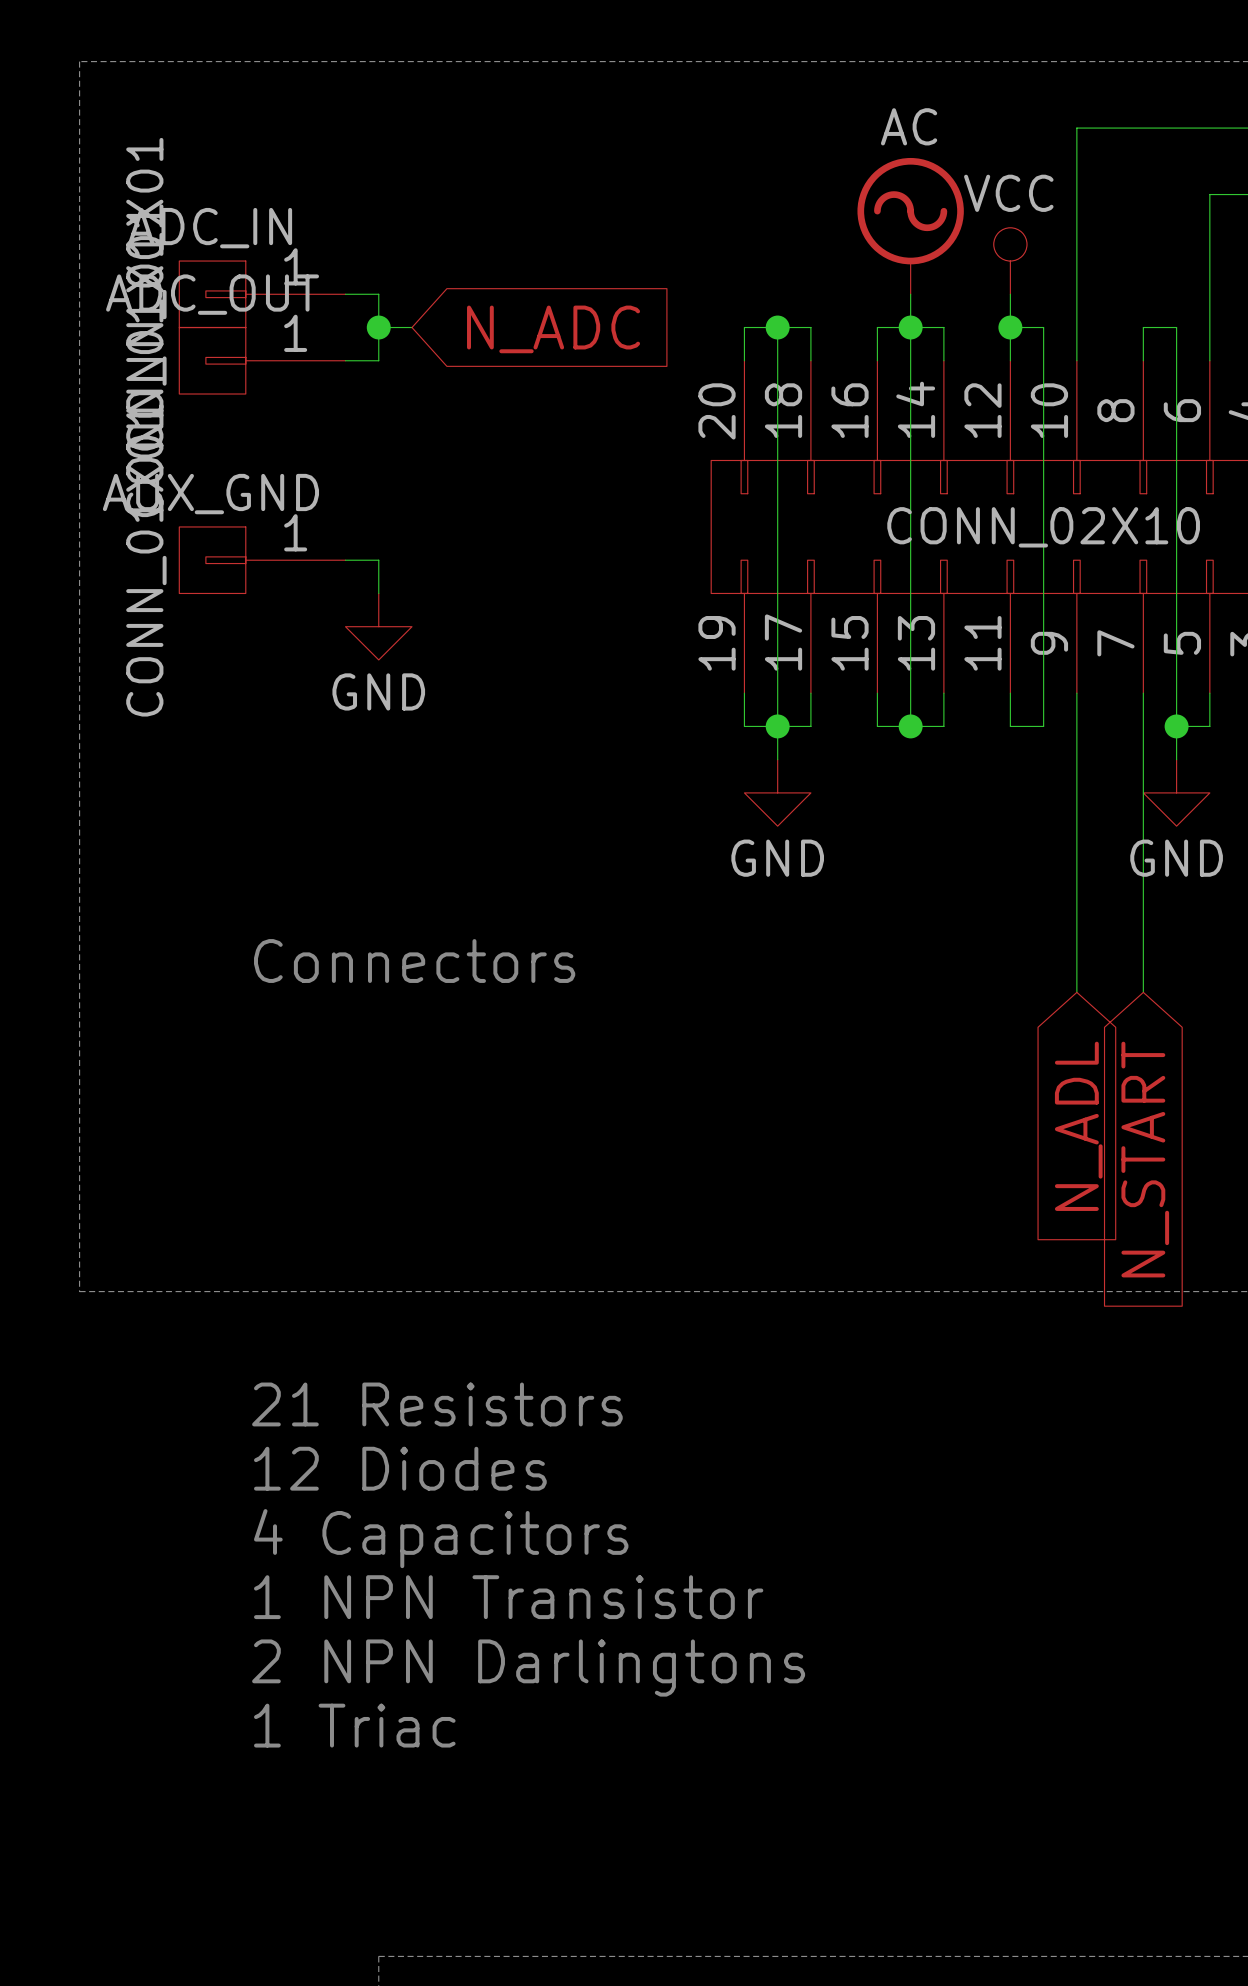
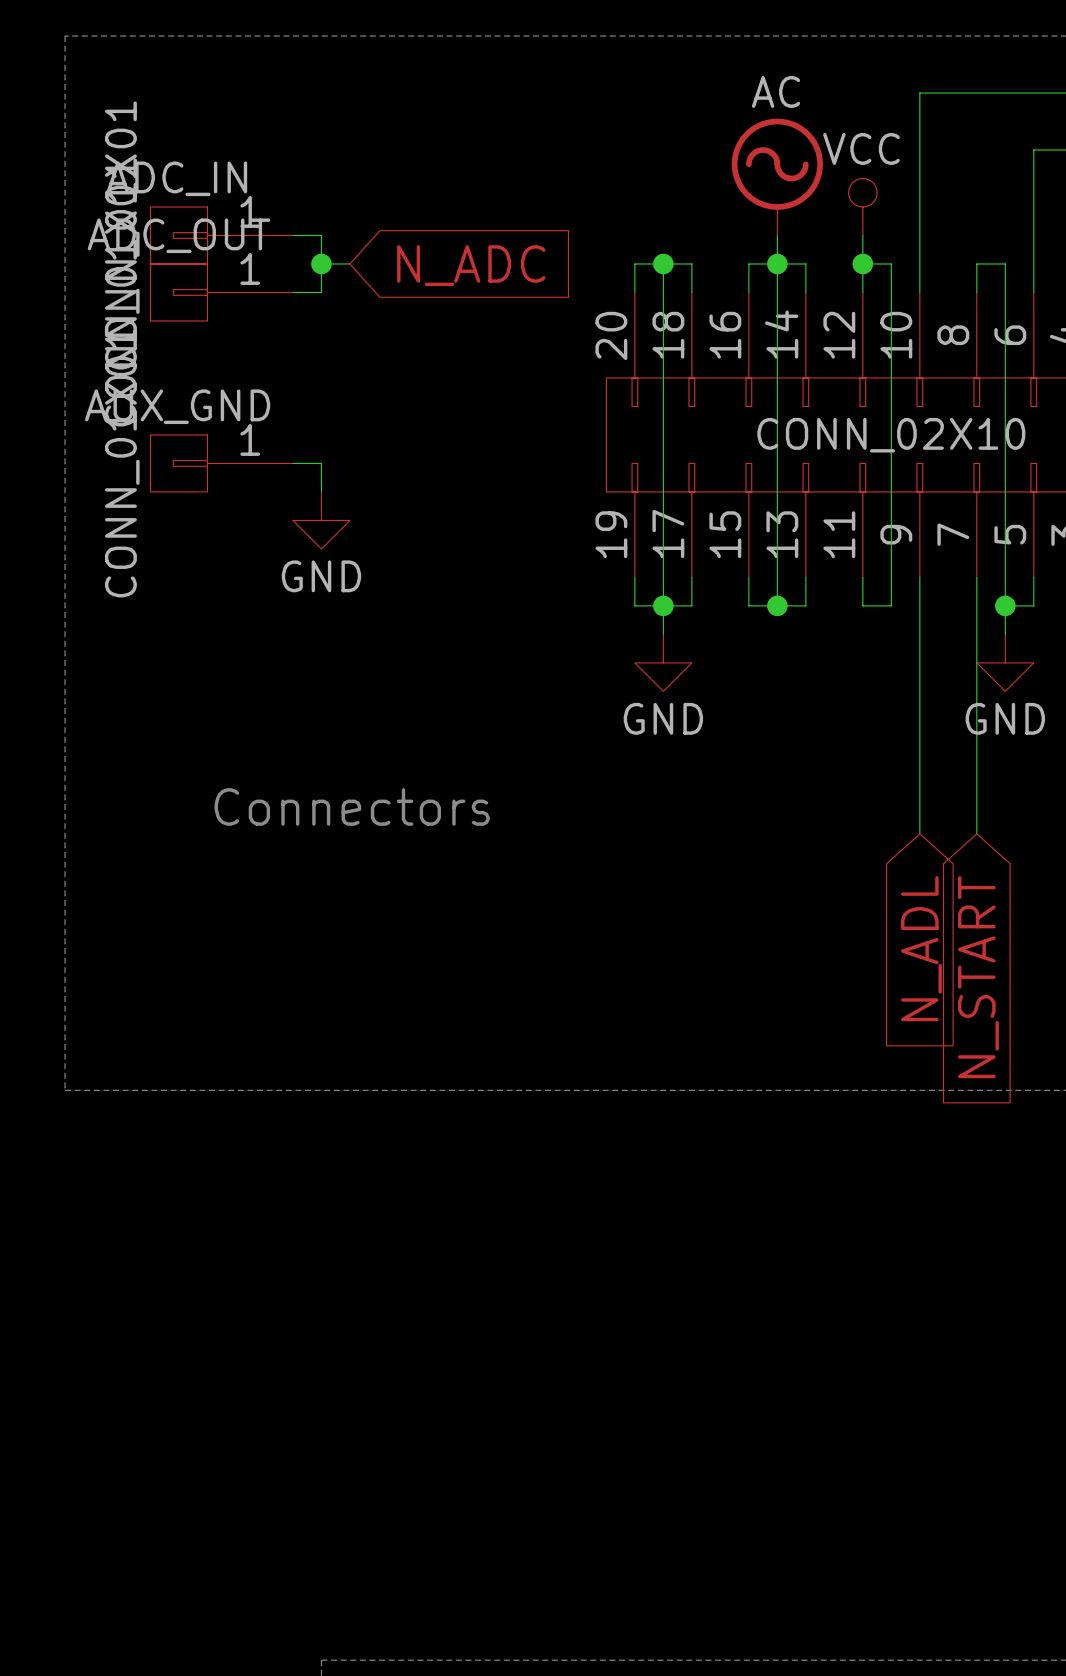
text: 21 Resistors (437, 1404) -> none
text: 12 Diodes (400, 1468) -> none
text: 4 Capacitors (441, 1538) -> none
text: 1 NPN Transistor (508, 1597) -> none
text: 2 NPN Darlingtons (528, 1668) -> none
text: 1 Triac (354, 1725) -> none

